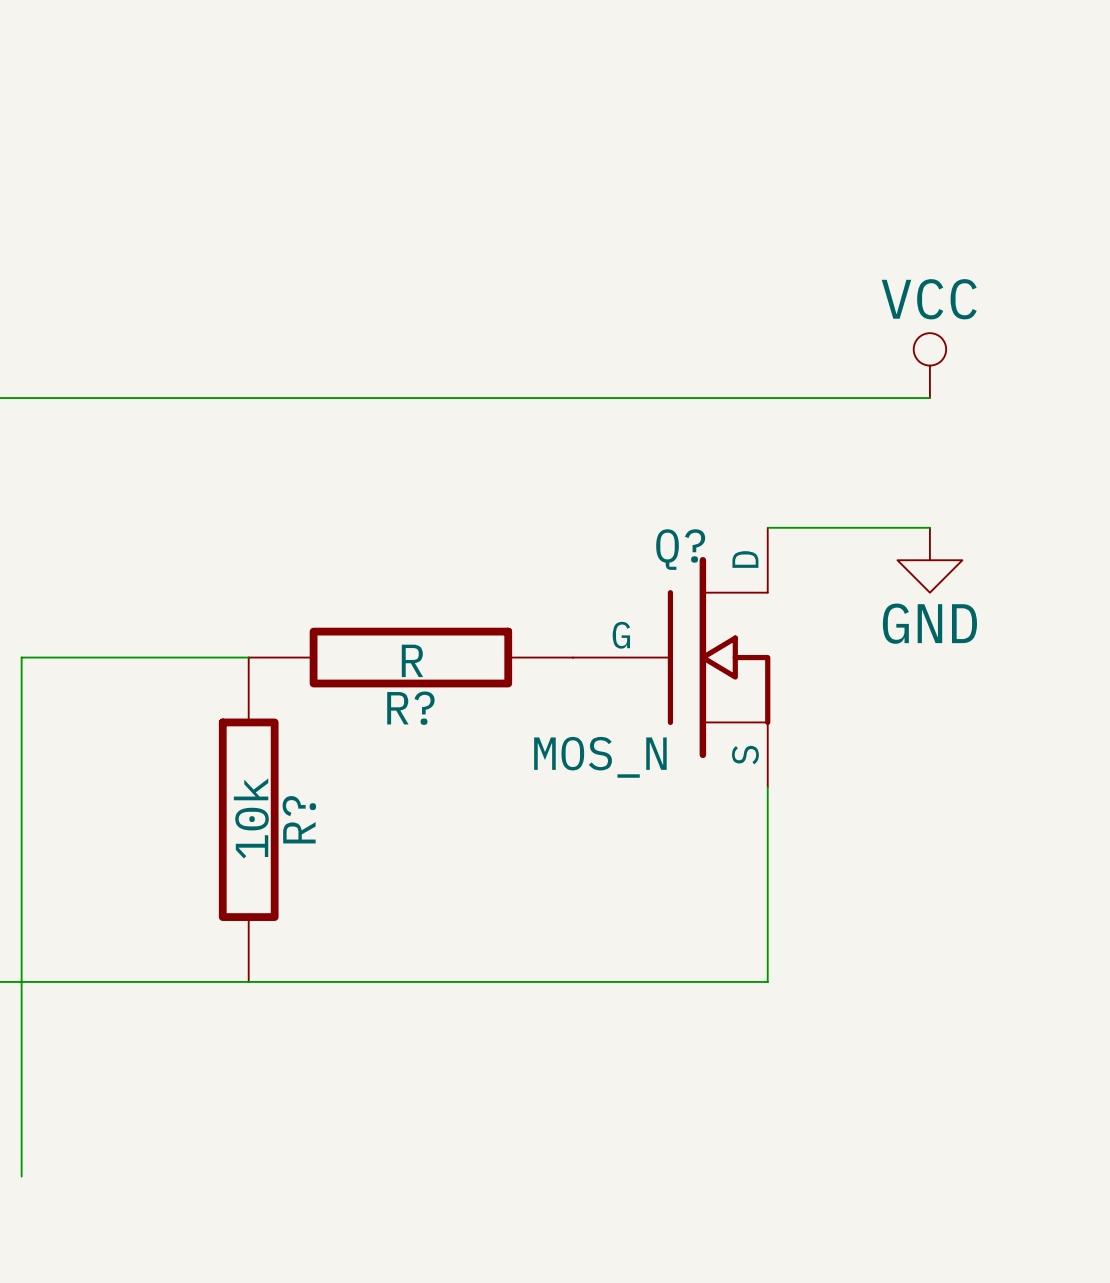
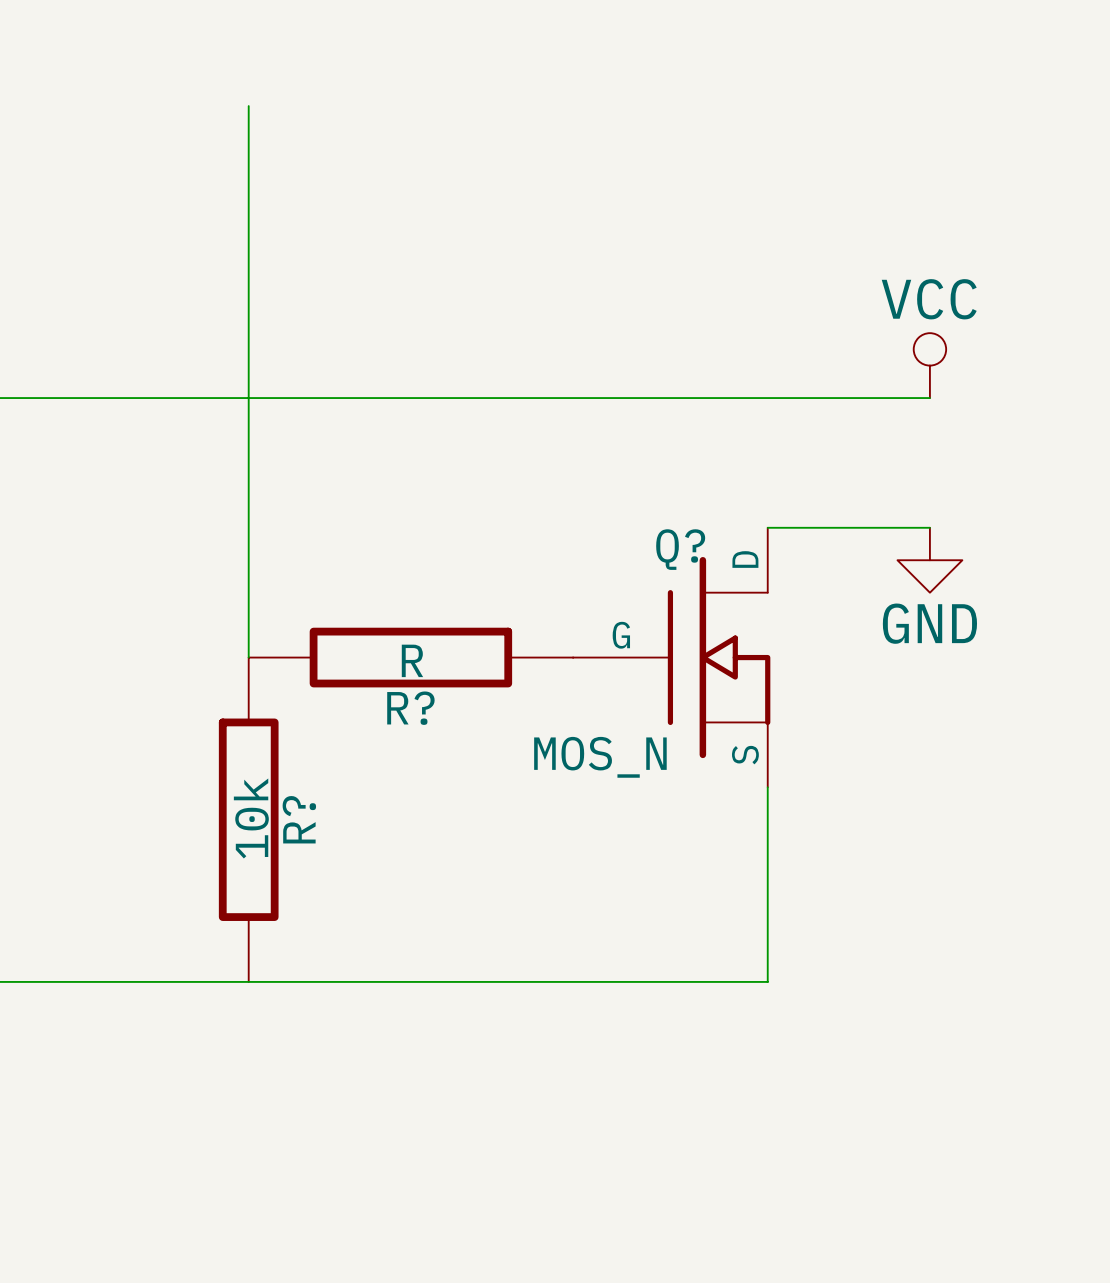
wire: (248, 657) (21, 657) (21, 1176) -> (248, 657) (248, 106)

